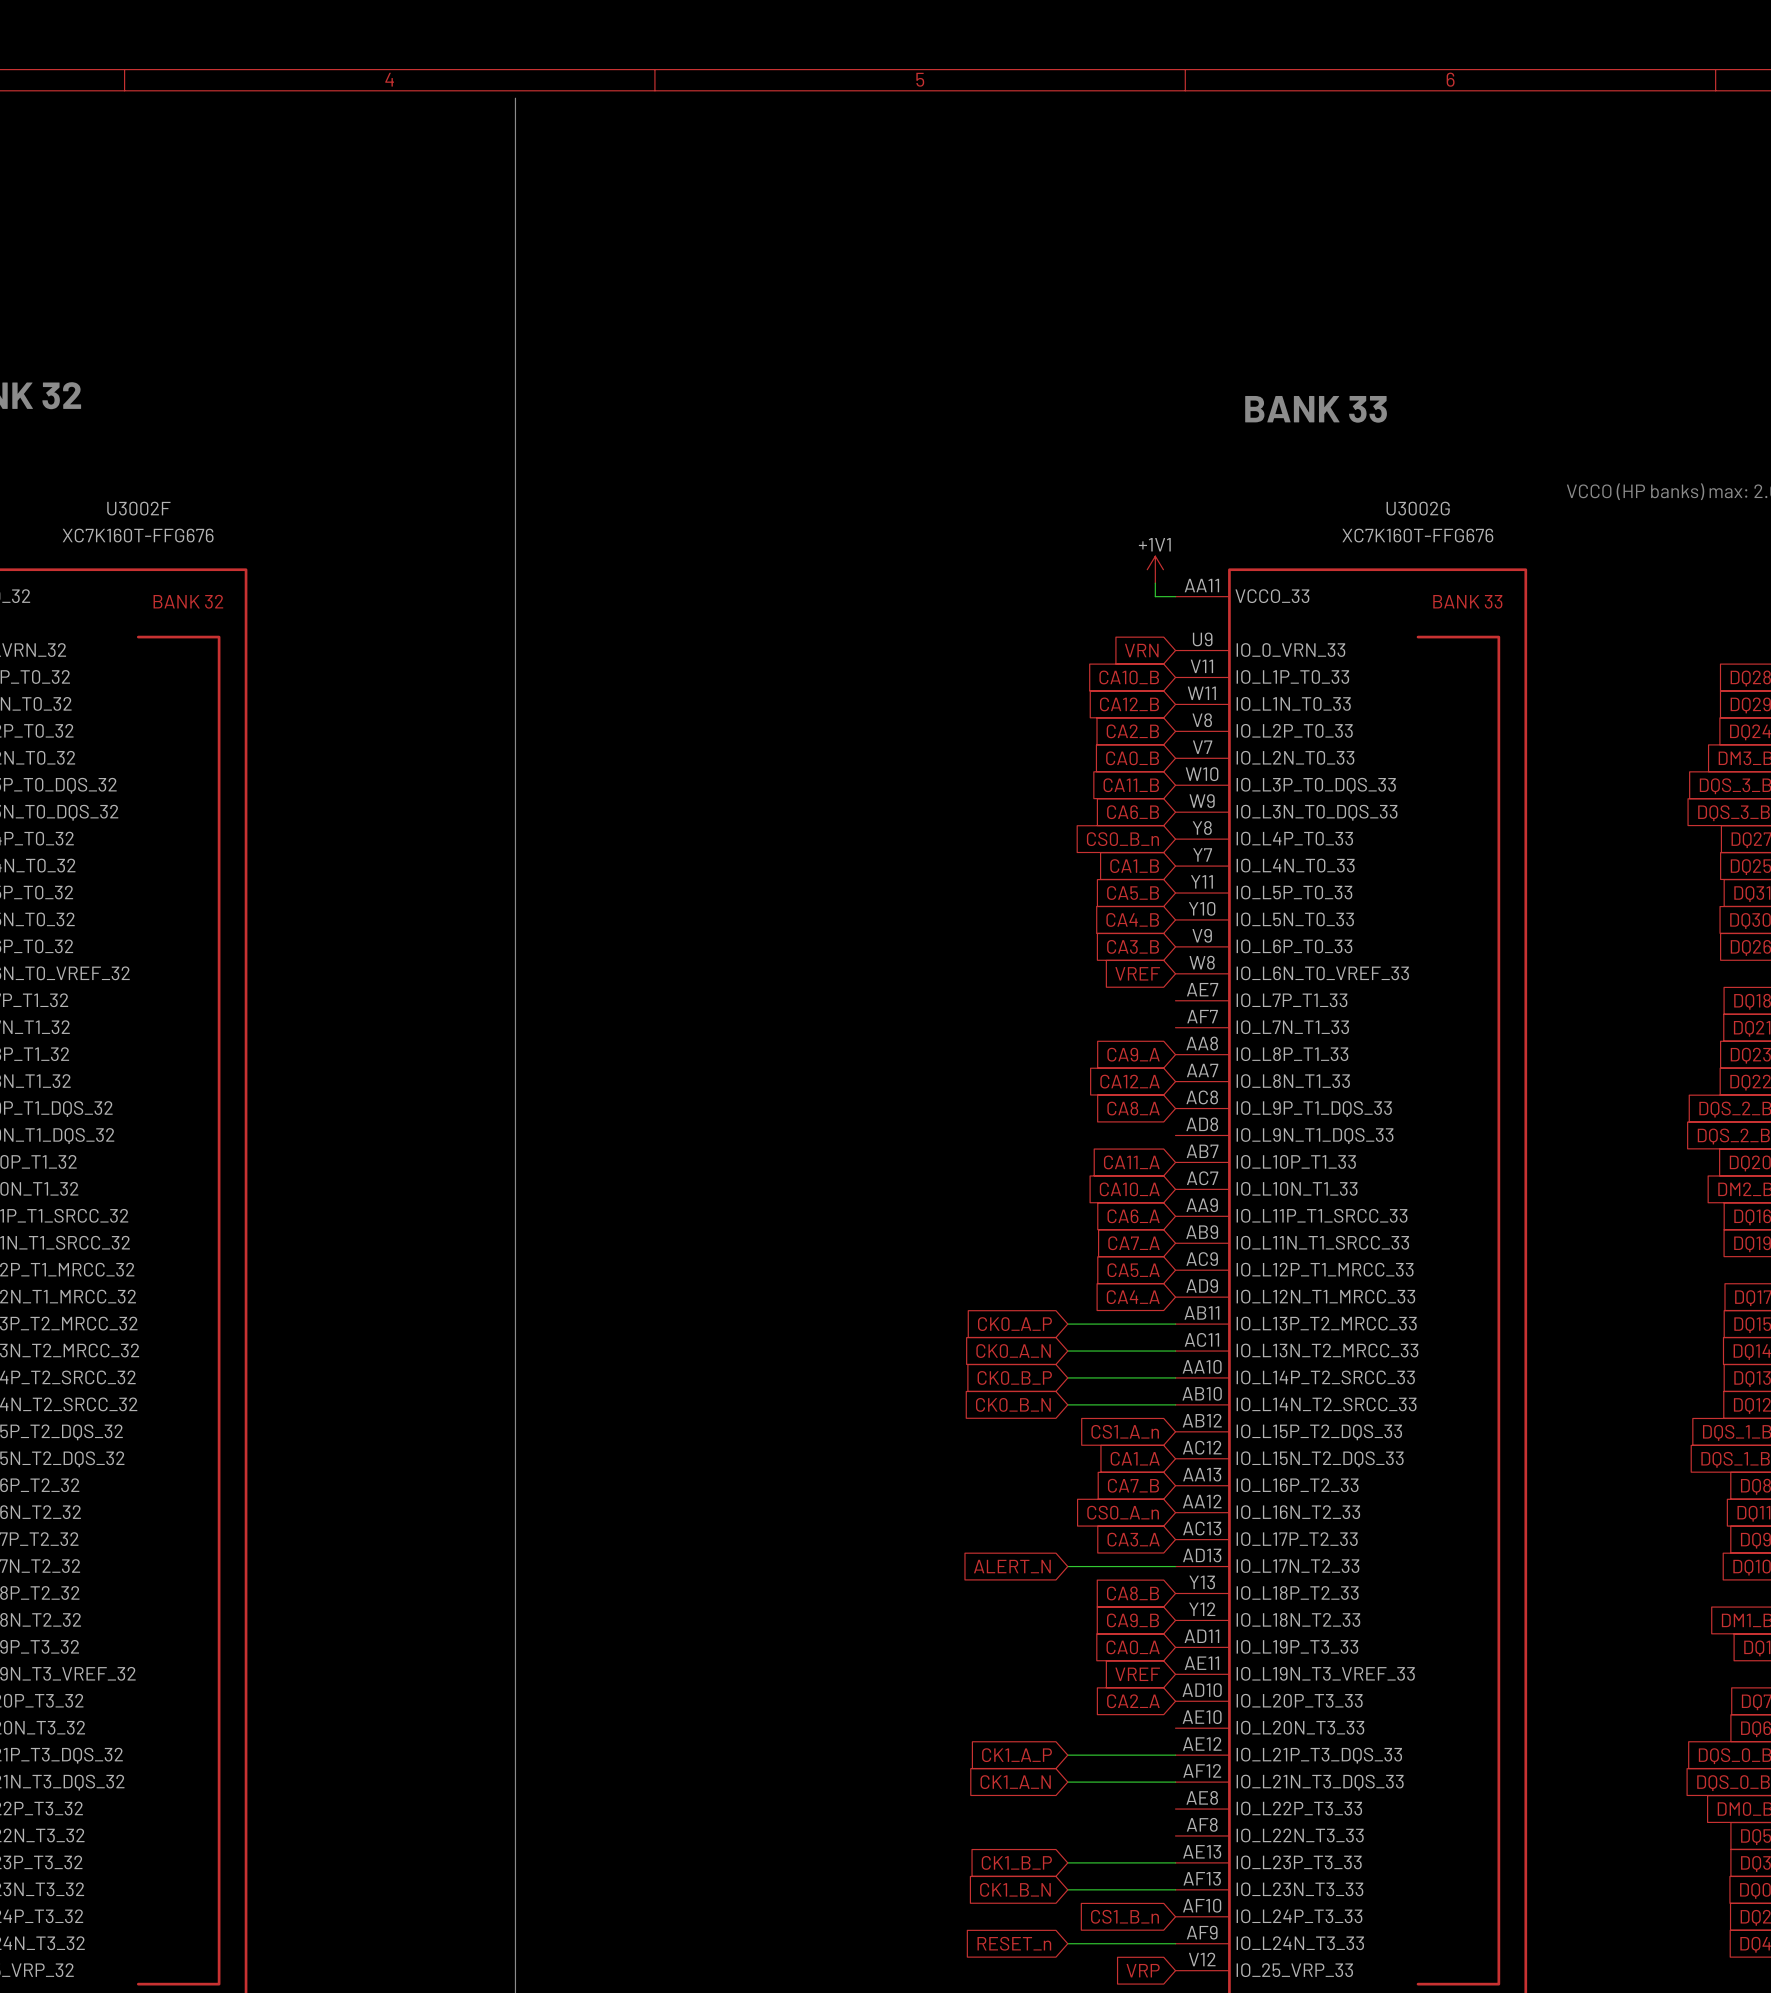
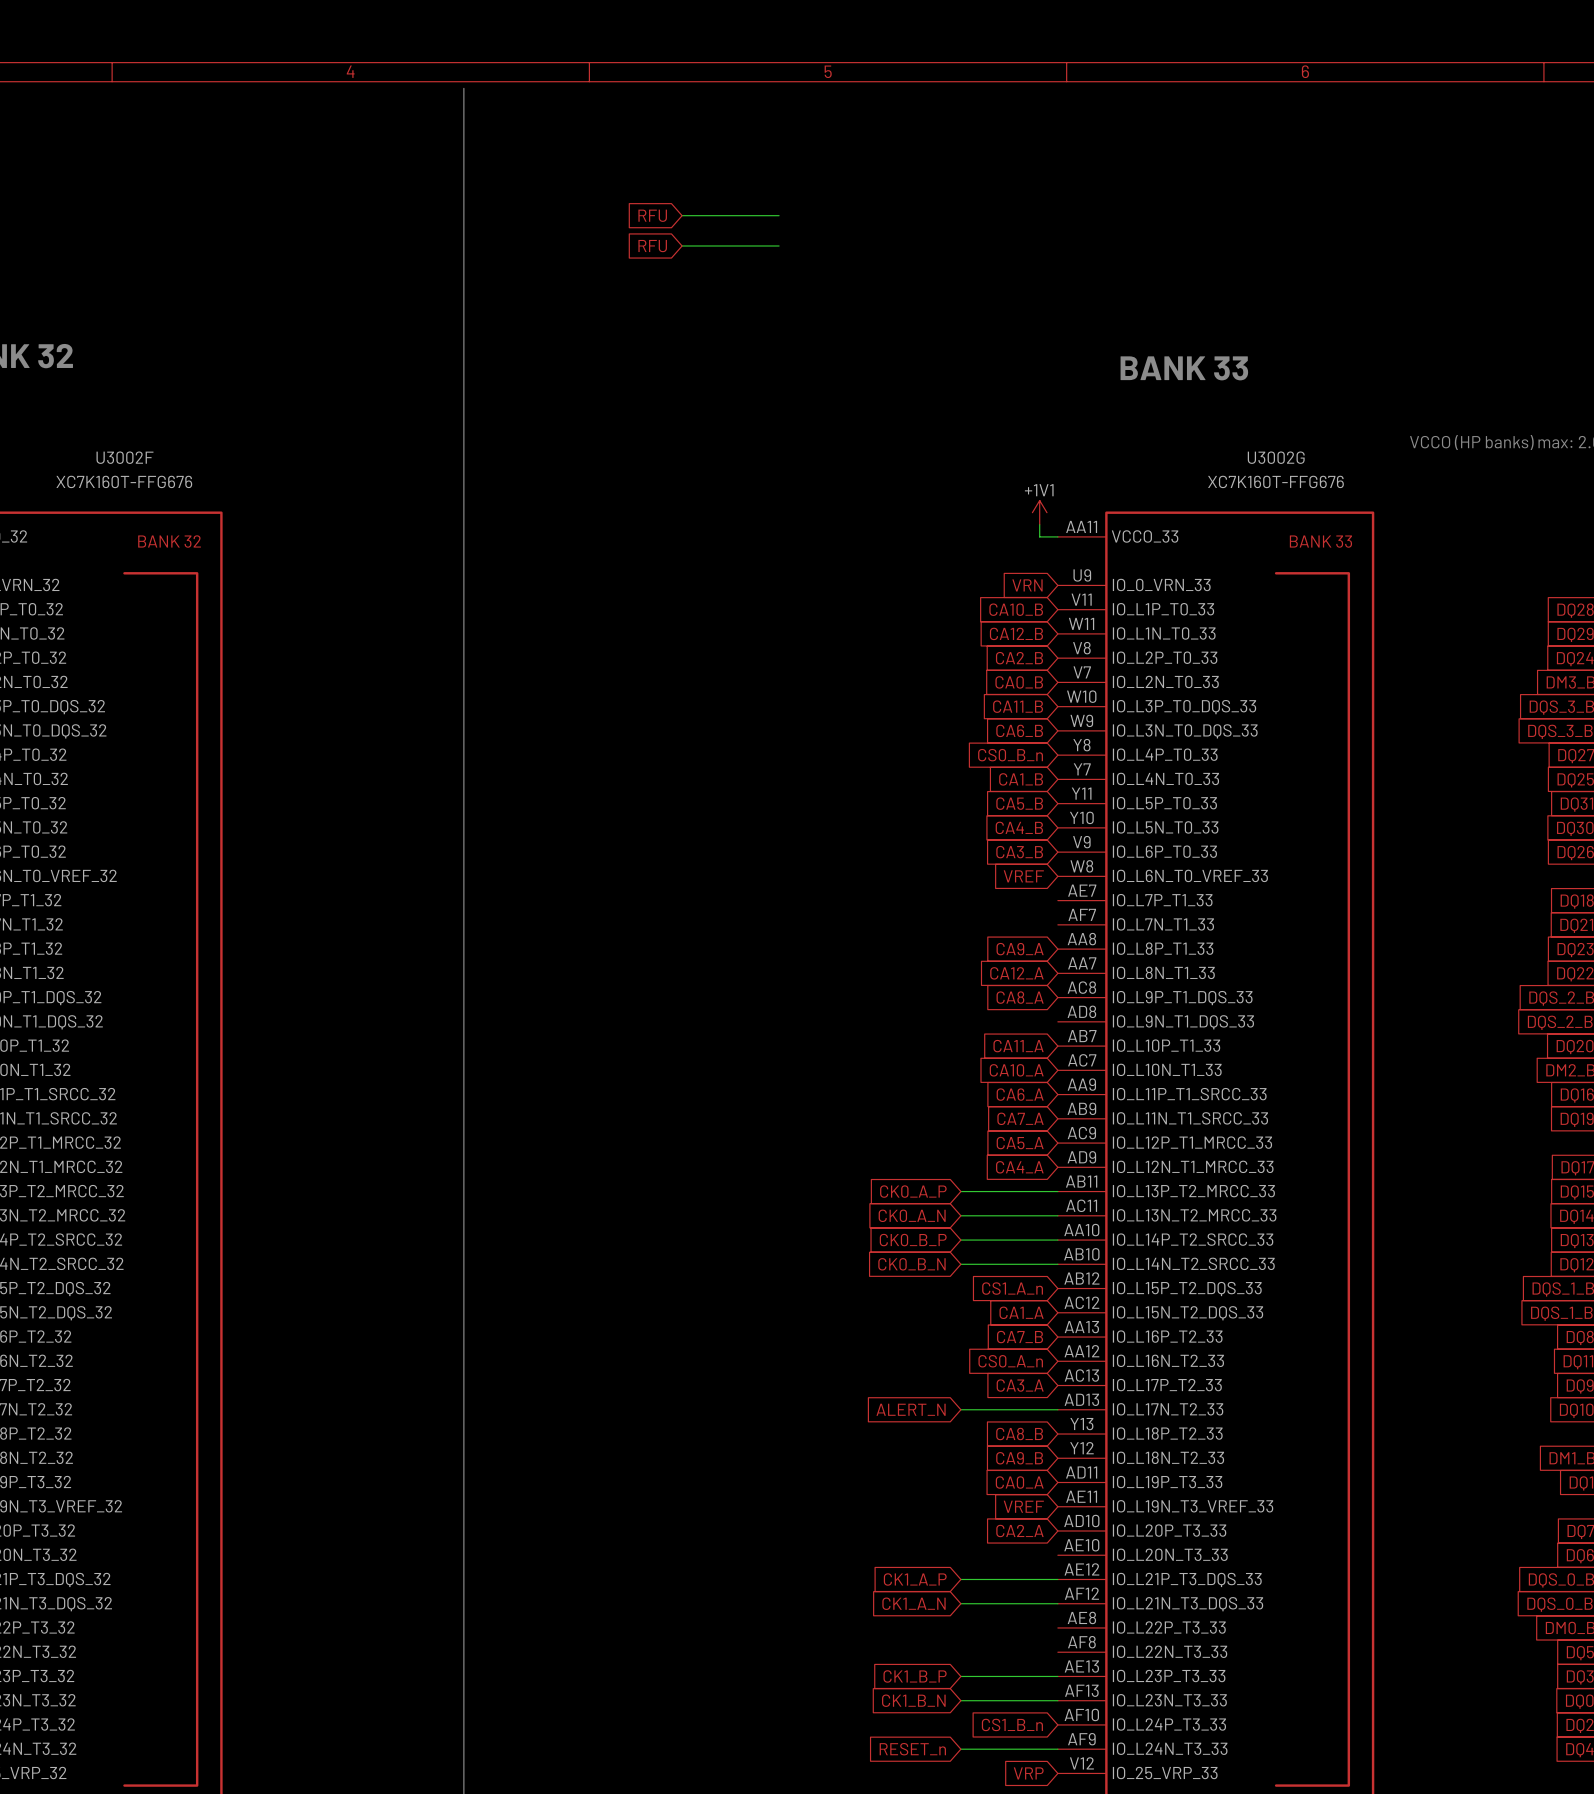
global label: none -> RFU (652, 215)
wire: none -> (682, 215) (779, 215)
global label: none -> RFU (652, 246)
wire: none -> (682, 245) (779, 245)

